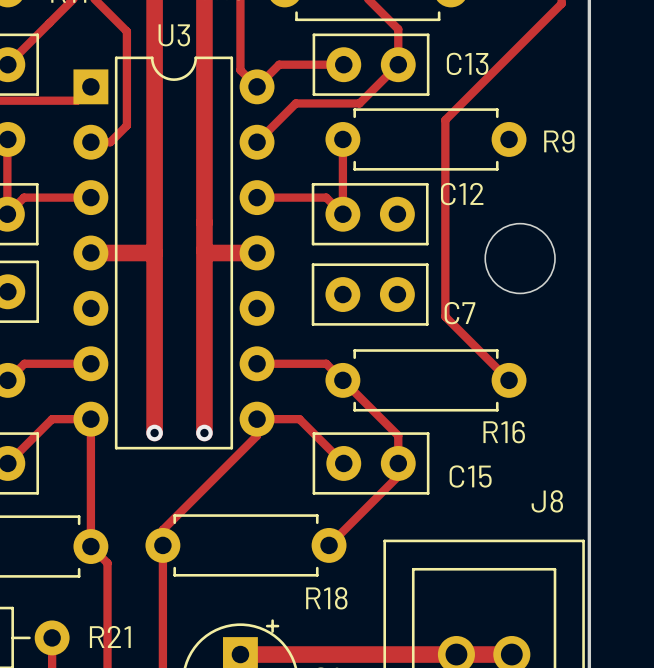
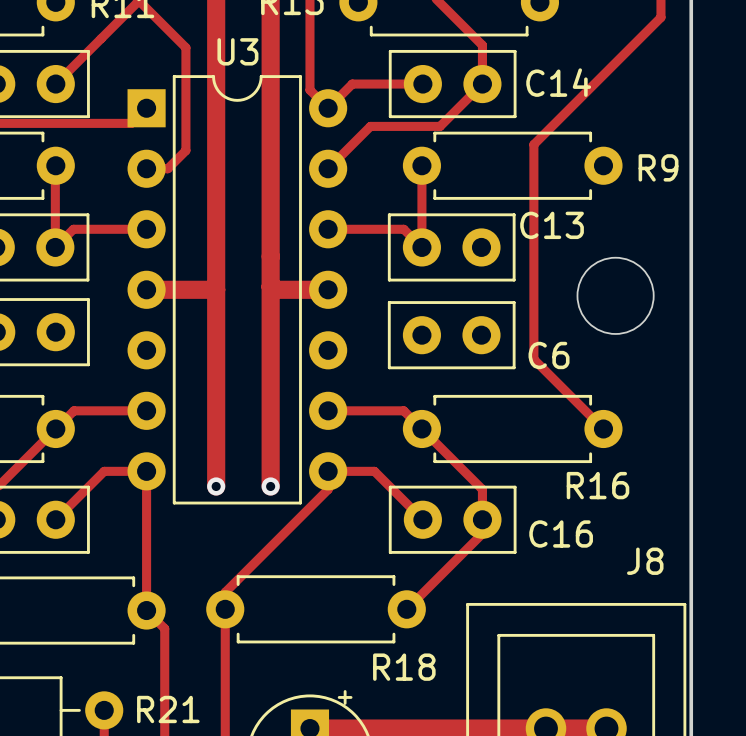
C13 name: C13 (467, 63) -> C14 (558, 82)
C12 name: C12 (462, 194) -> C13 (552, 225)
C7 name: C7 (459, 313) -> C6 (549, 355)
C15 name: C15 (470, 476) -> C16 (561, 534)

